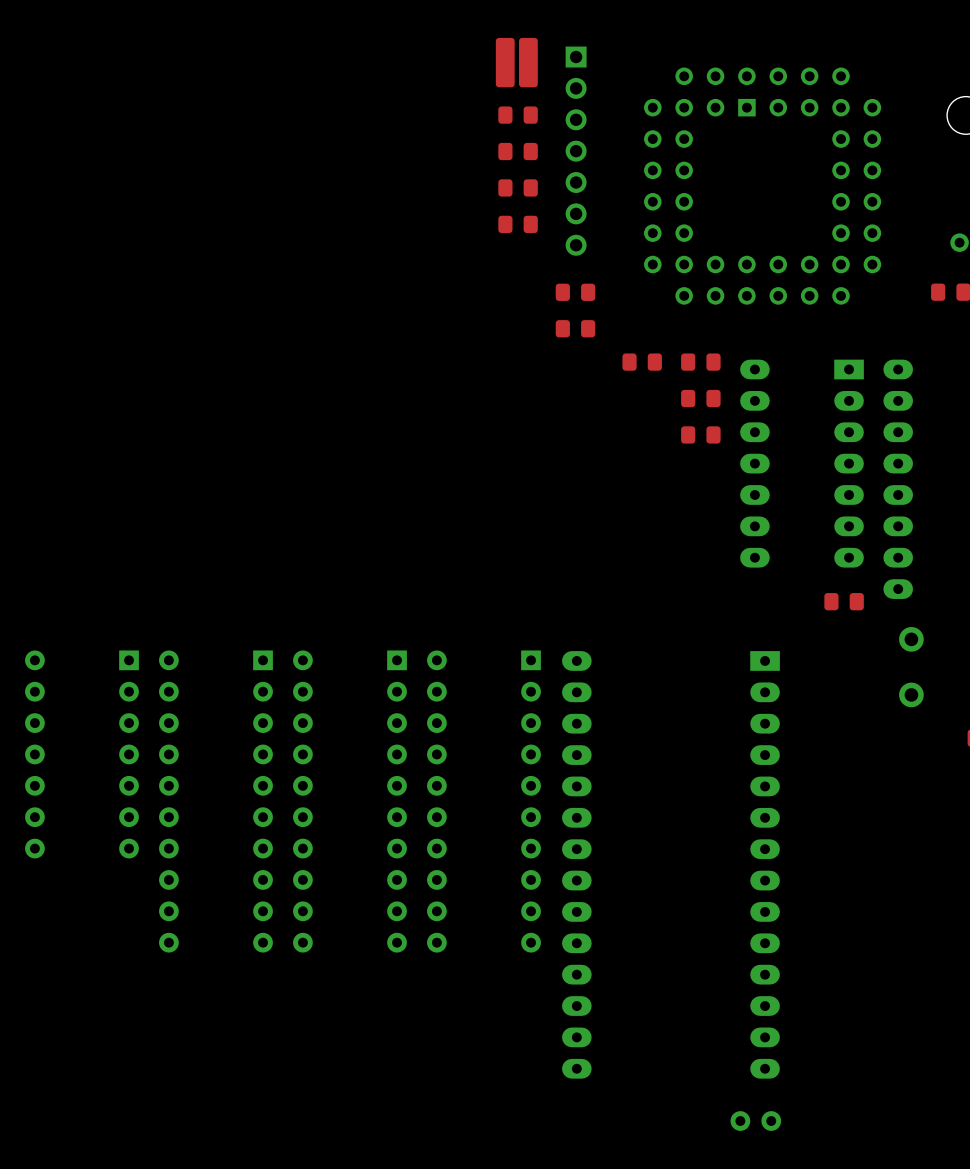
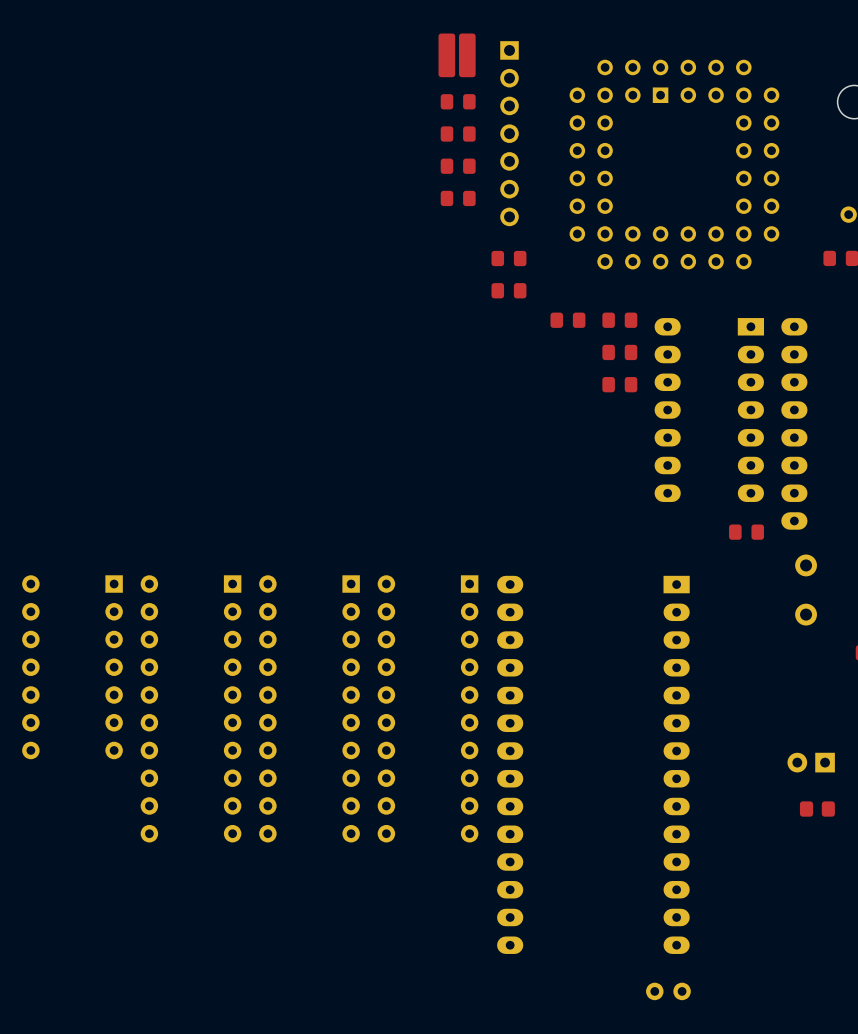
part: none -> (811, 762)
part: none -> (817, 809)

